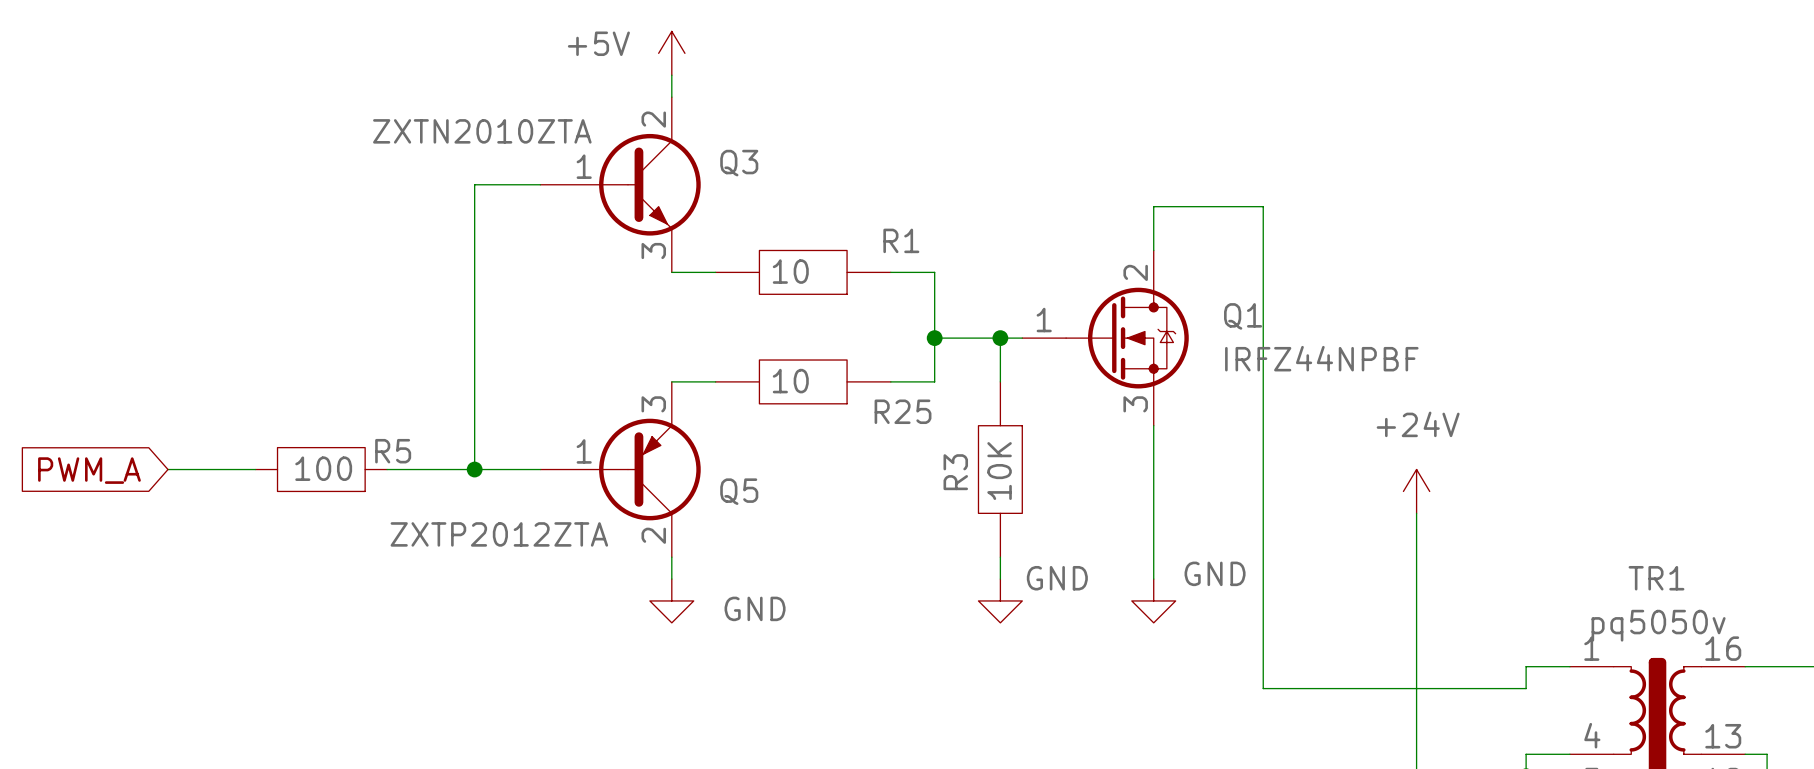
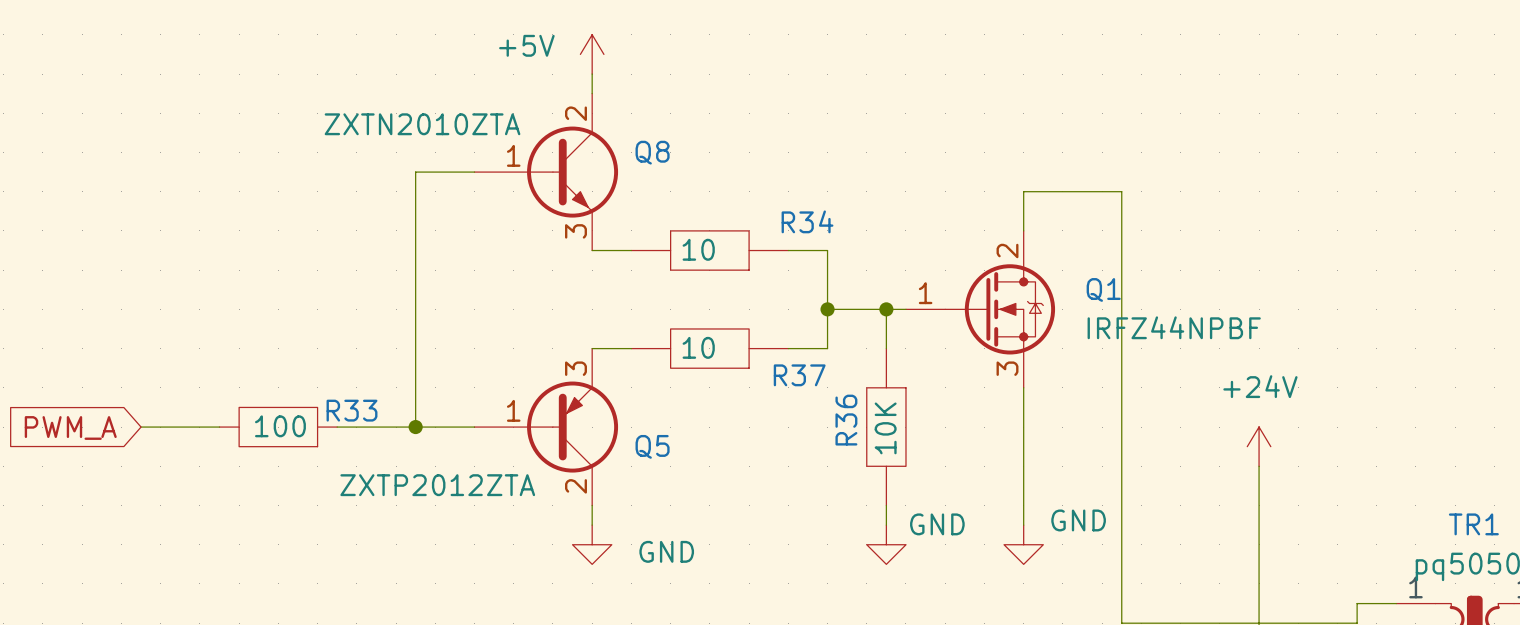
Q3 name: Q3 (739, 163) -> Q8 (652, 152)
R1 name: R1 (901, 240) -> R34 (807, 221)
R25 name: R25 (903, 411) -> R37 (799, 375)
R5 name: R5 (393, 451) -> R33 (352, 410)
R3 name: R3 (955, 472) -> R36 (846, 420)

